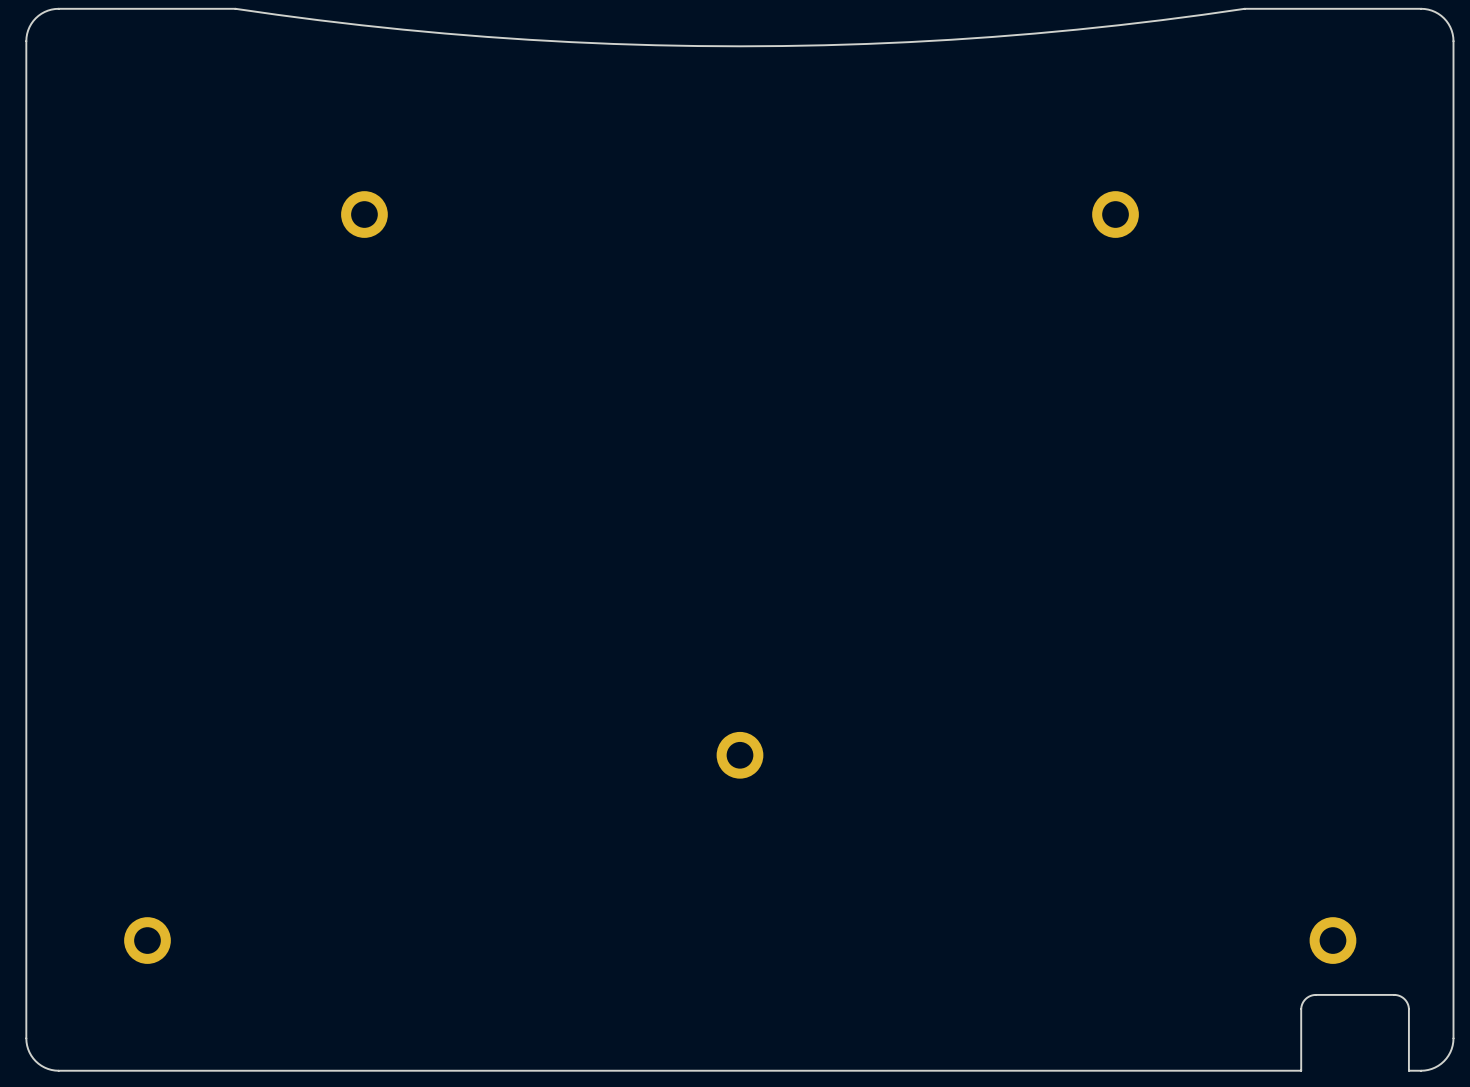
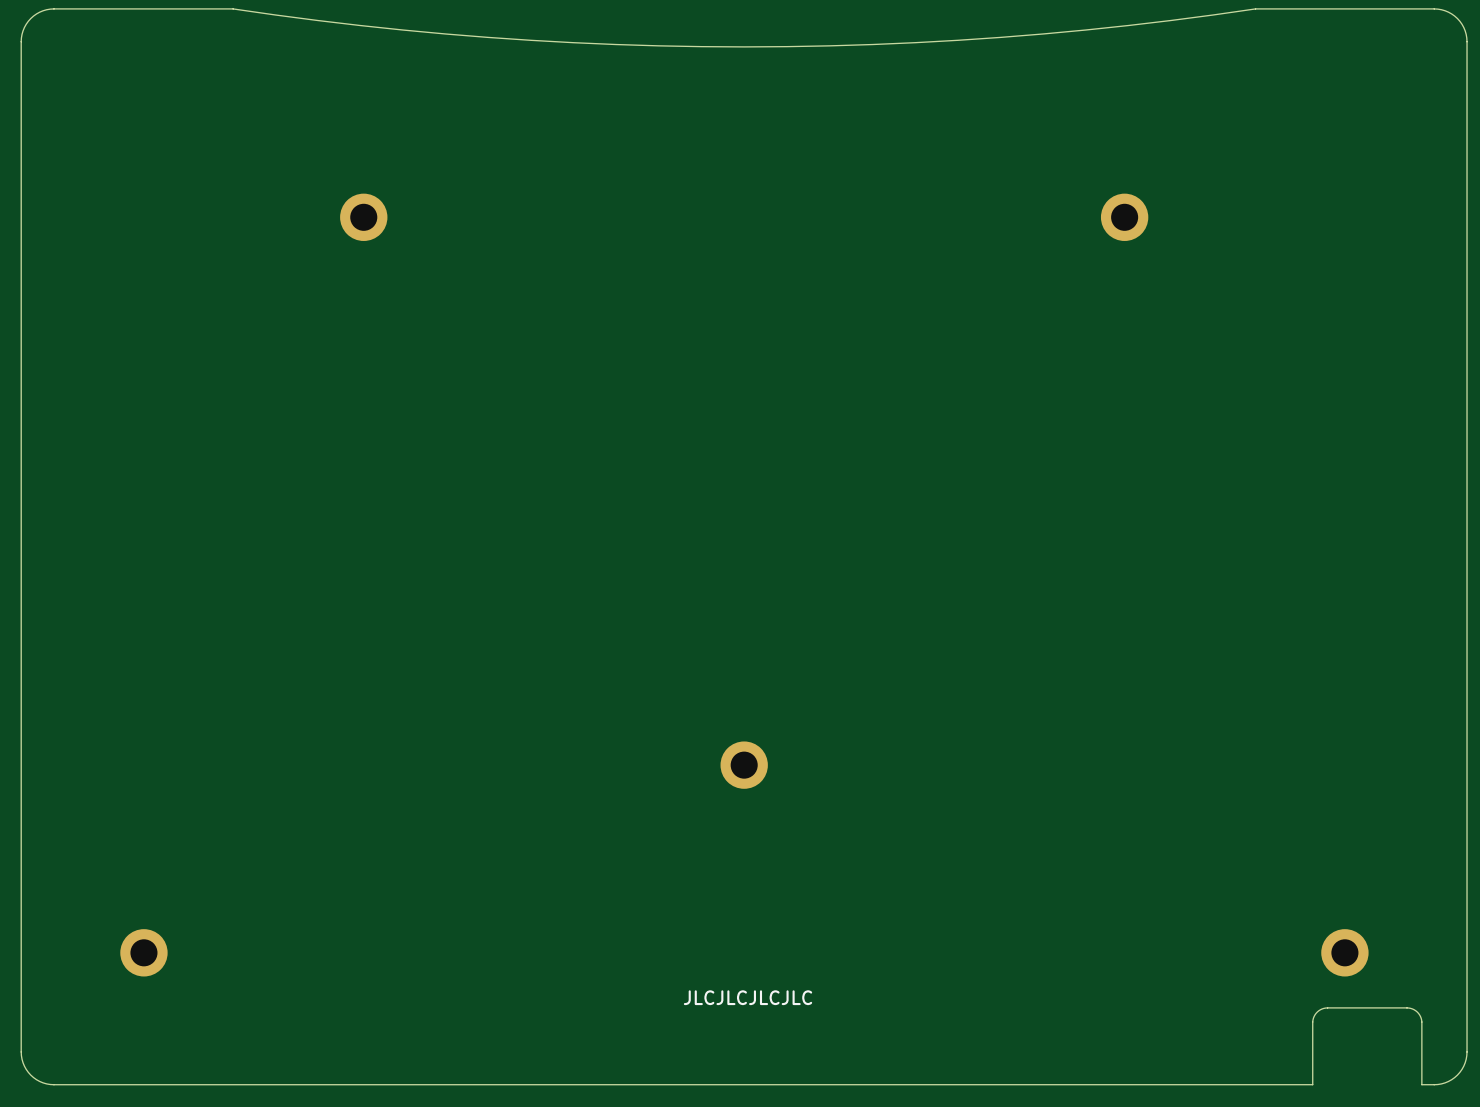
text: none -> JLCJLCJLCJLC (748, 997)

